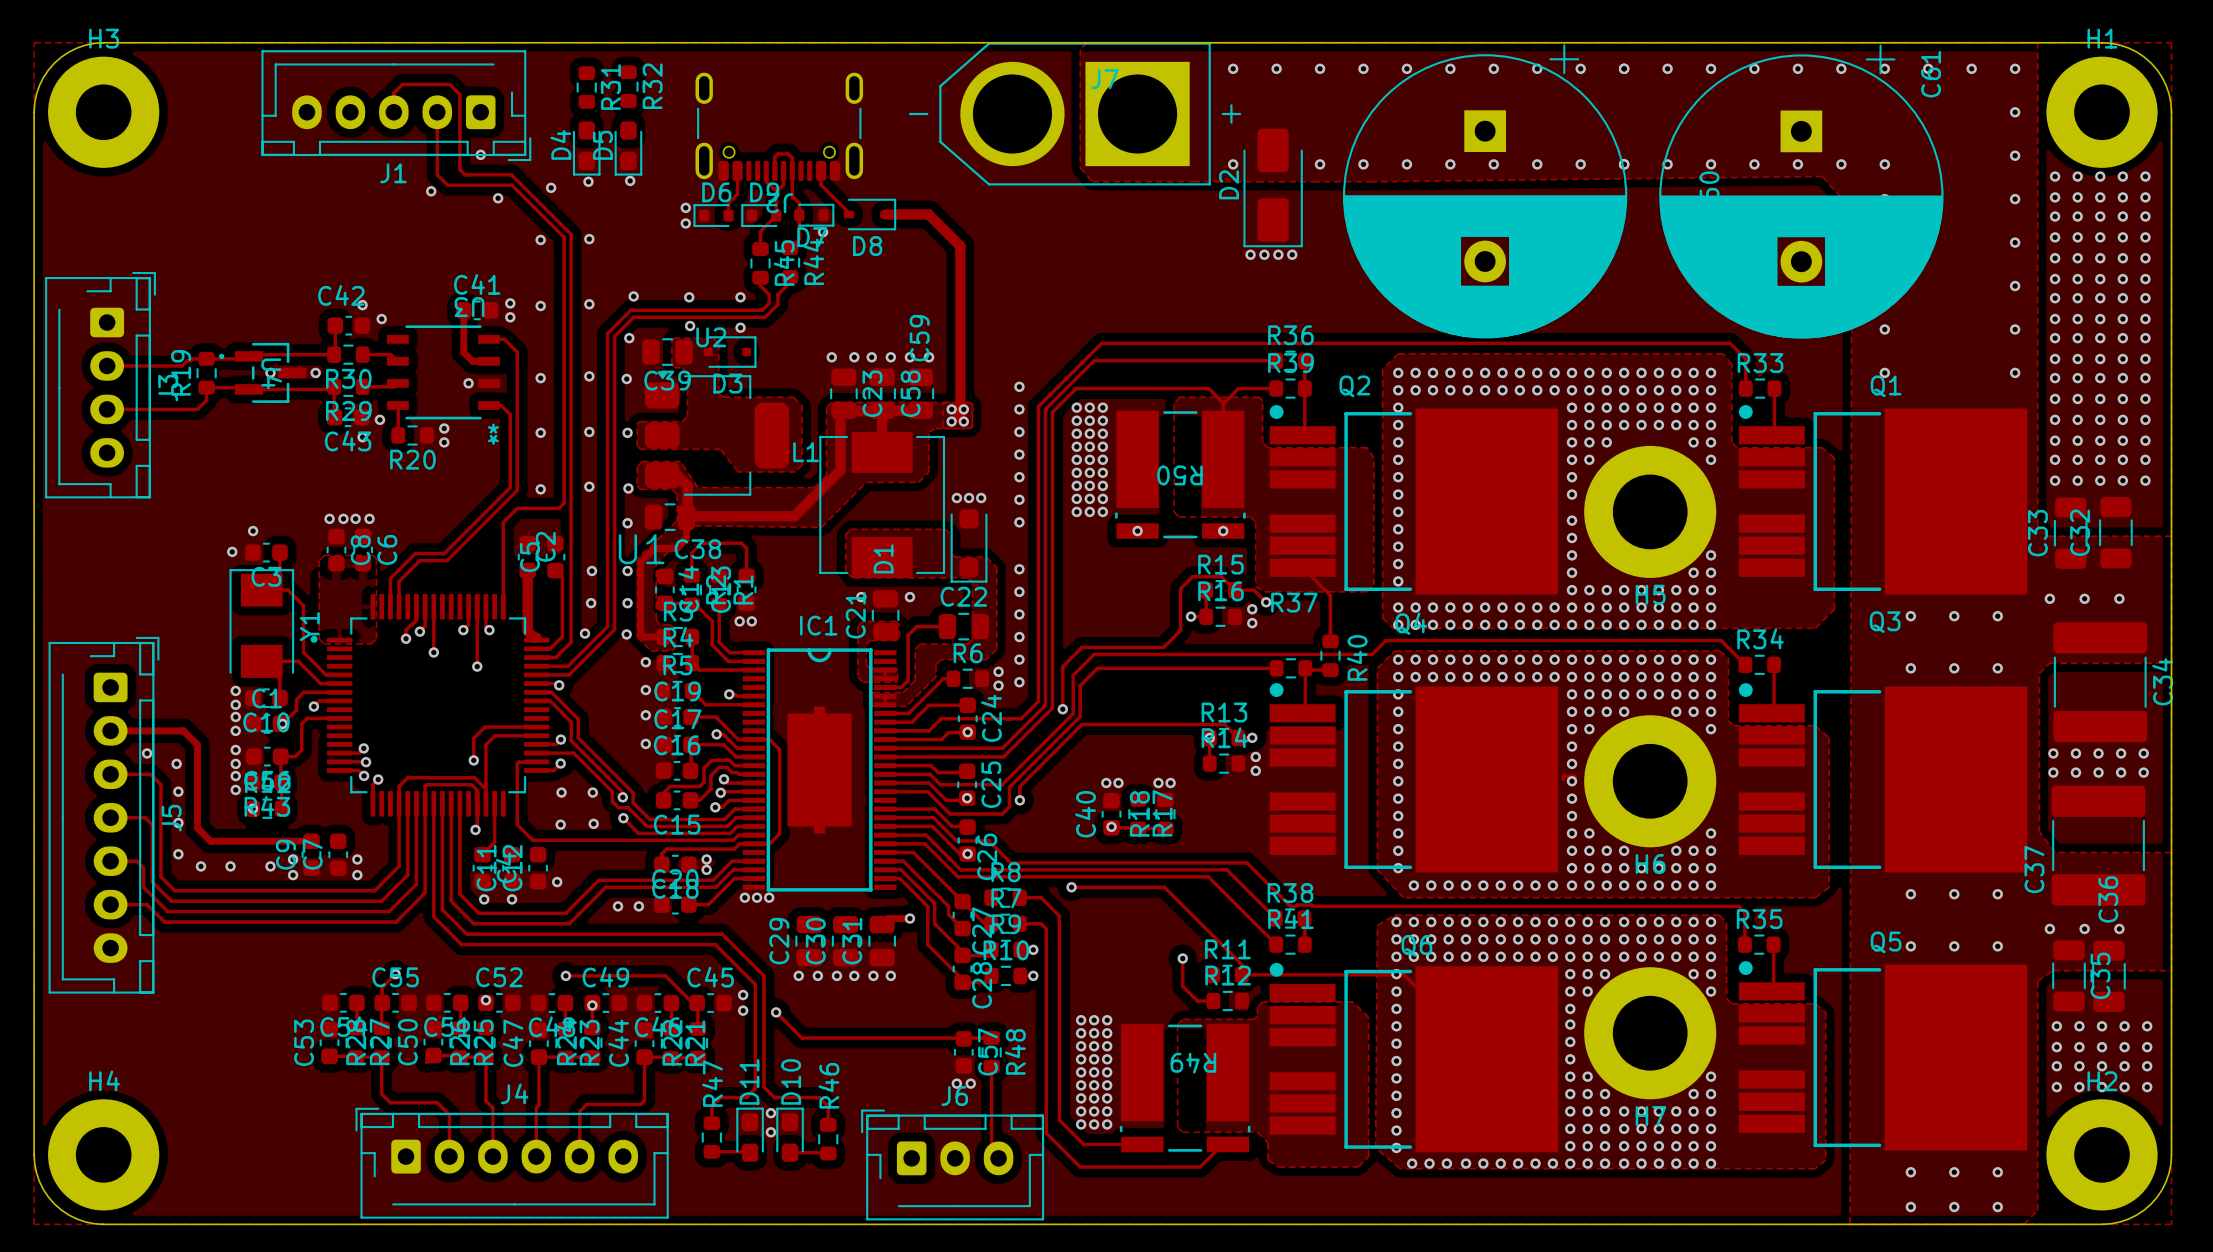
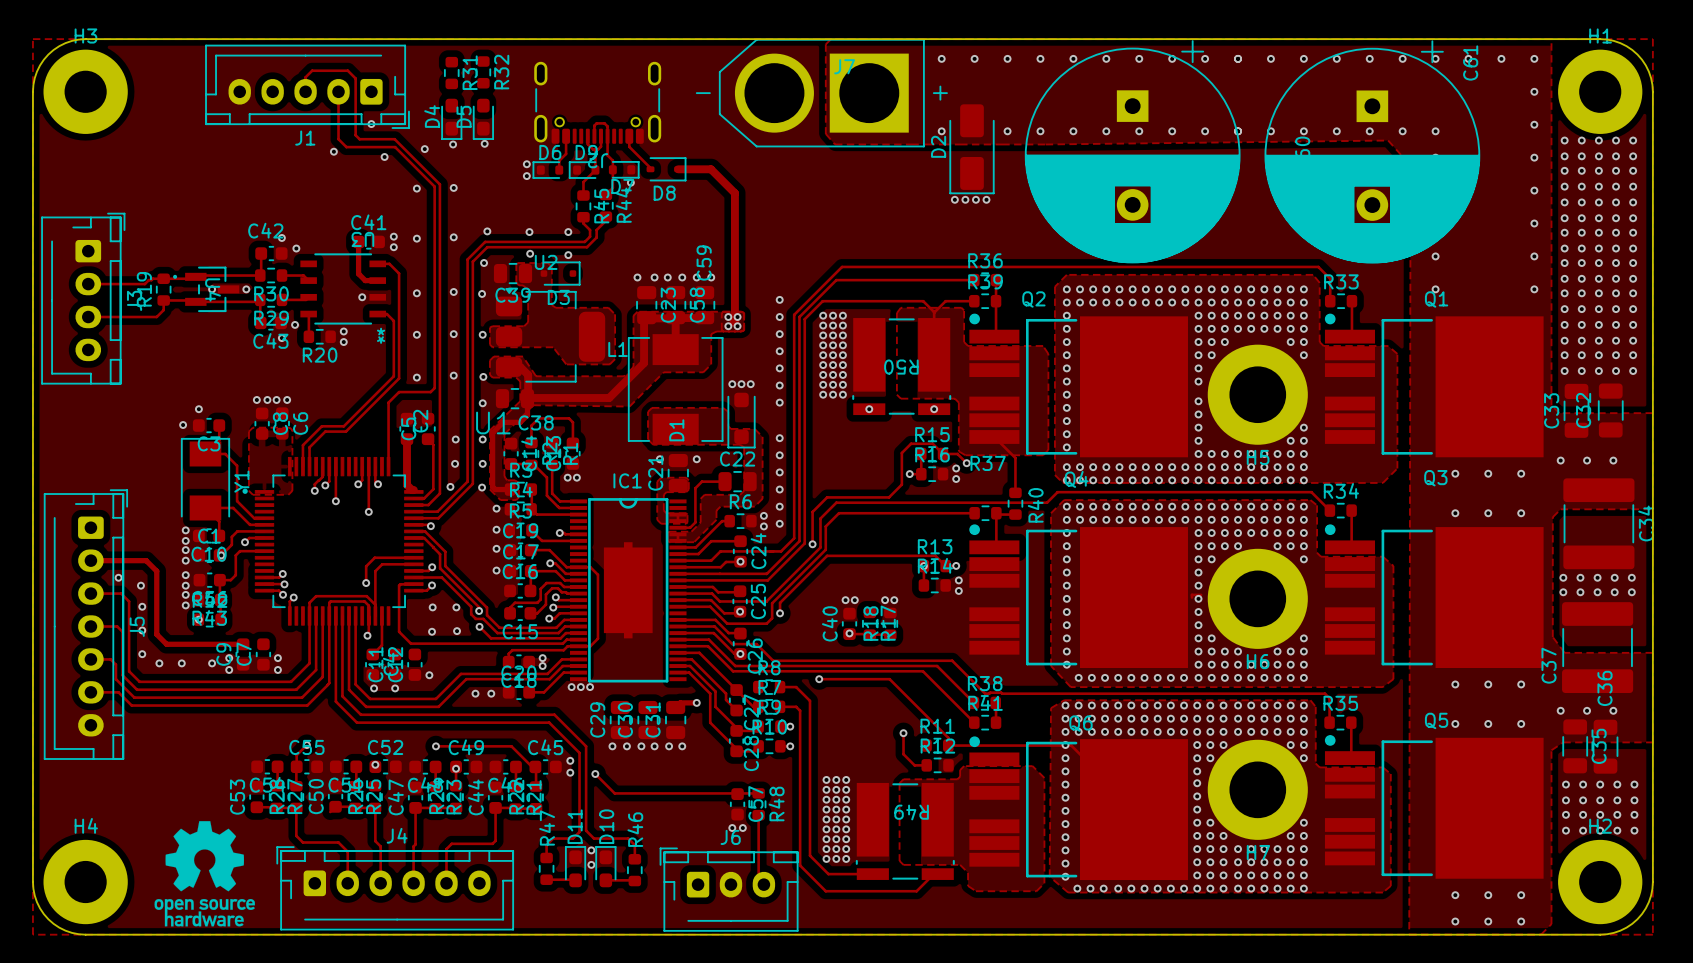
drawing: none -> [154, 821, 255, 927]

